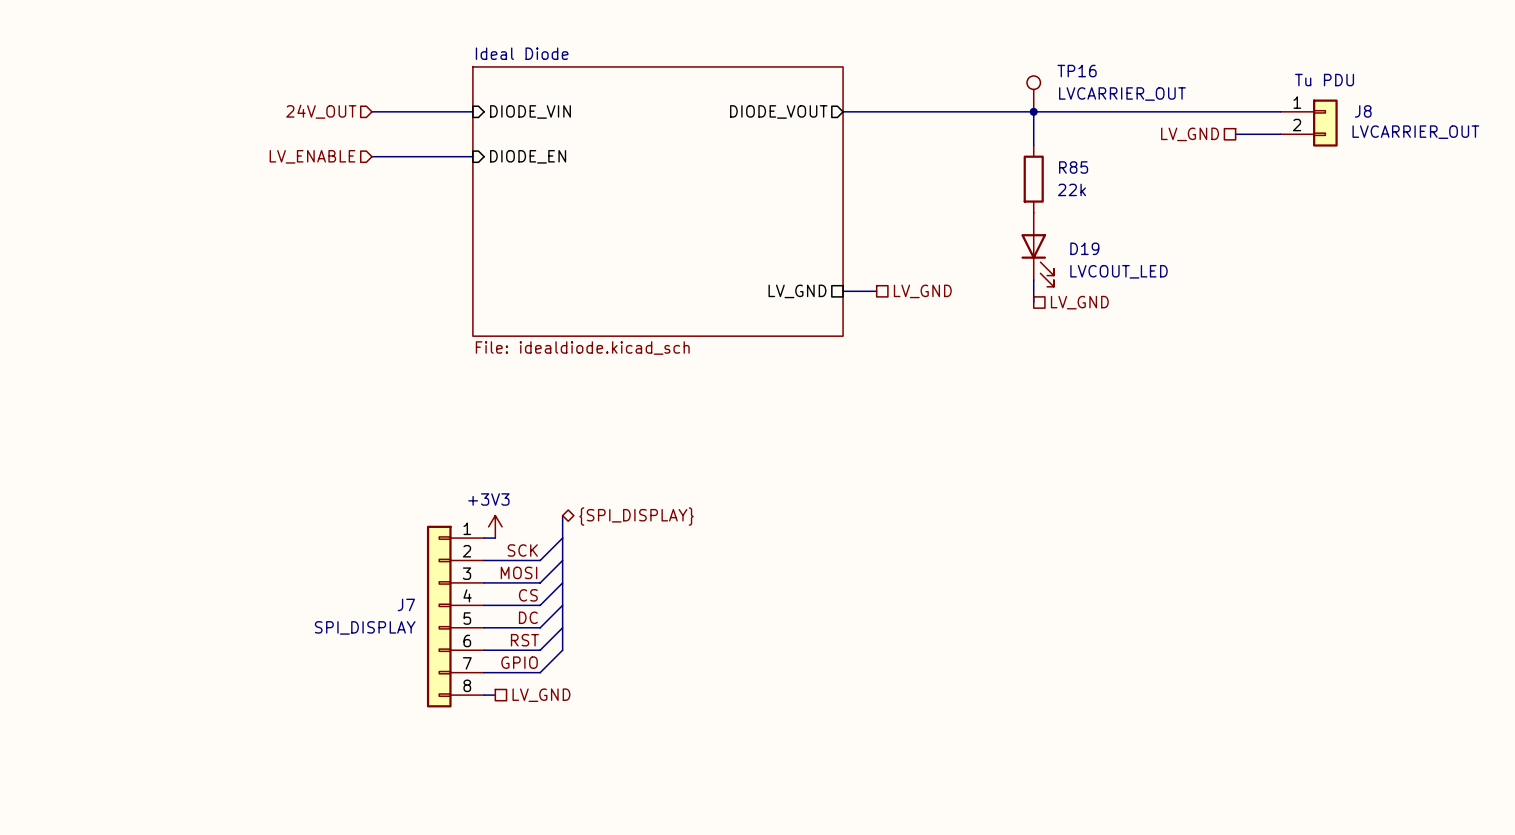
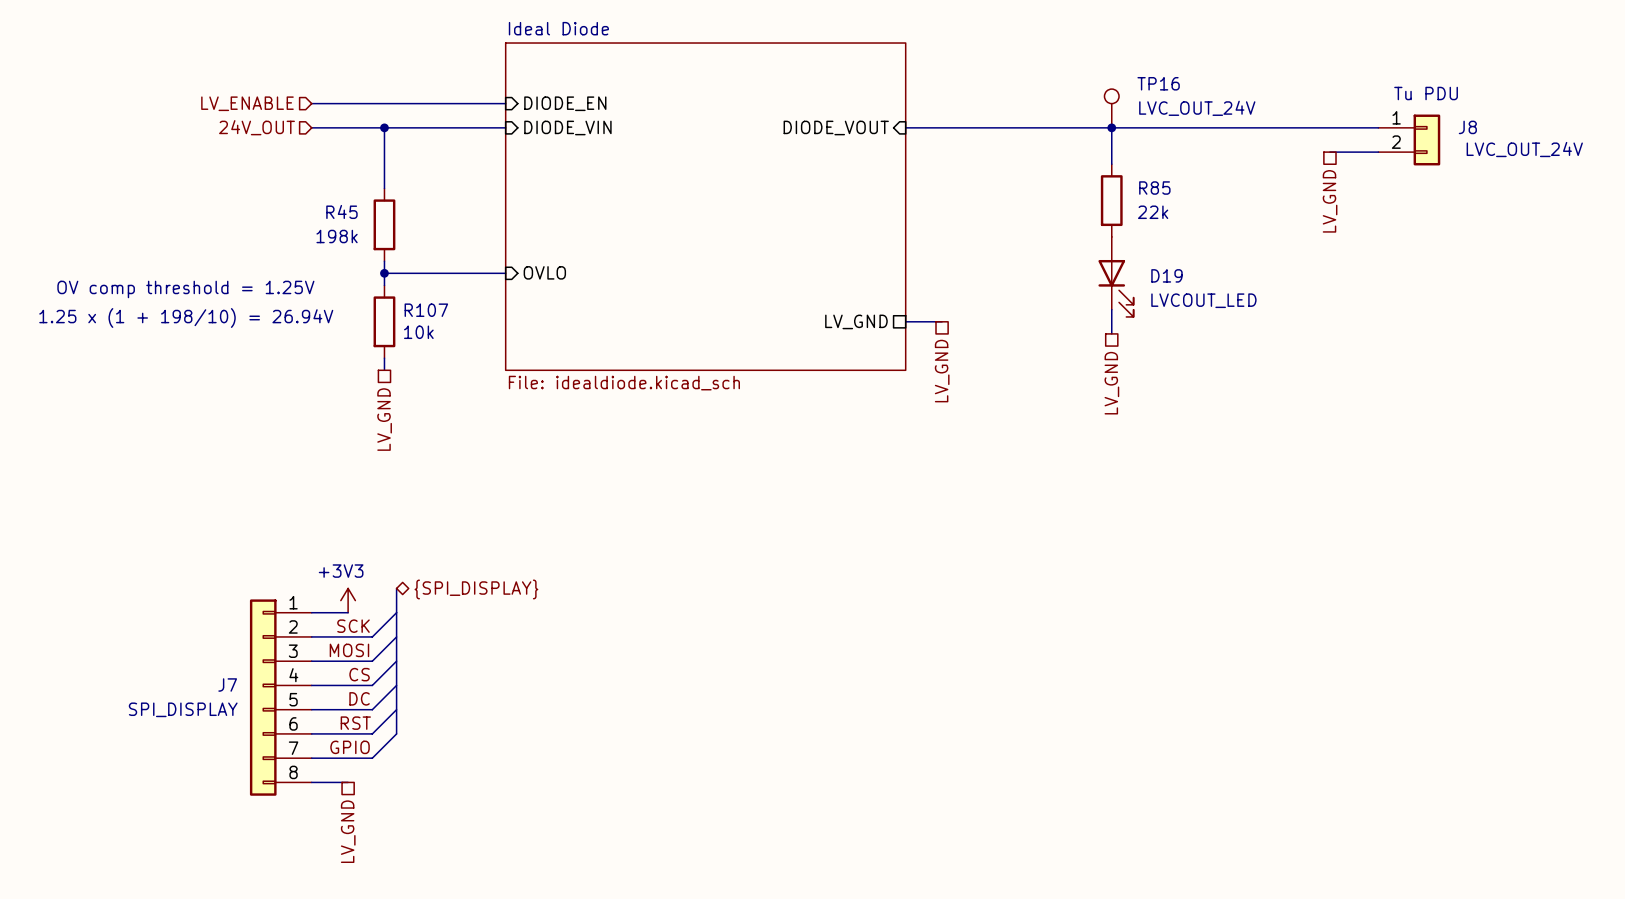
wire: none -> (311, 103) (505, 103)
TP16 value: LVCARRIER_OUT (1122, 94) -> LVC_OUT_24V (1197, 108)
wire: none -> (311, 127) (396, 127)
hierarchical label position: 24V_OUT (321, 111) -> 24V_OUT (257, 127)
wire: none -> (384, 127) (384, 188)
junction: none -> (384, 127)
sheet pin shape: output (778, 111) -> input (836, 127)
J8 value: LVCARRIER_OUT (1415, 132) -> LVC_OUT_24V (1524, 149)
hierarchical label rotation: 0° (1190, 134) -> 90° counterclockwise (1330, 201)
hierarchical label position: LV_ENABLE (312, 156) -> LV_ENABLE (247, 103)
wire: (371, 156) (472, 156) -> none
sheet pin position: DIODE_EN (528, 156) -> DIODE_EN (565, 103)
sheet Ideal Diode: none -> File: idealdiode.kicad_sch (705, 206)
R45: none -> 198k (384, 224)
sheet Ideal Diode: File: idealdiode.kicad_sch (657, 201) -> none
wire: none -> (384, 261) (384, 285)
wire: none -> (384, 273) (505, 273)
junction: none -> (384, 273)
sheet pin: none -> OVLO (544, 272)
text: none -> OV comp threshold = 1.25V (185, 289)
text: none -> 1.25 x (1 + 198/10) = 26.94V (186, 317)
R107: none -> 10k (384, 321)
hierarchical label rotation: 0° (922, 291) -> 90° clockwise (942, 371)
hierarchical label rotation: 0° (1079, 302) -> 90° clockwise (1111, 383)
wire: none -> (384, 358) (384, 370)
hierarchical label: none -> LV_GND (384, 419)
bus: (562, 515) (562, 650) -> (396, 588) (396, 733)
hierarchical label position: {SPI_DISPLAY} (636, 516) -> {SPI_DISPLAY} (476, 589)
power symbol position: +3V3 (495, 526) -> +3V3 (348, 600)
wire: (484, 538) (495, 538) -> none
wire: (562, 538) (540, 560) (484, 560) -> (396, 612) (372, 636) (311, 636)
label position: SCK (522, 550) -> SCK (353, 626)
wire: none -> (311, 612) (348, 612)
wire: (562, 560) (540, 582) (484, 582) -> (396, 636) (372, 661) (311, 661)
label position: MOSI (519, 572) -> MOSI (349, 650)
wire: (562, 582) (540, 605) (484, 605) -> (396, 661) (372, 685) (311, 685)
label position: CS (528, 595) -> CS (359, 674)
wire: (562, 605) (540, 627) (484, 627) -> (396, 685) (372, 709) (311, 709)
J7 position: (455, 616) -> (280, 697)
label position: DC (528, 617) -> DC (359, 698)
wire: (562, 627) (540, 650) (484, 650) -> (396, 709) (372, 733) (311, 733)
label position: RST (524, 640) -> RST (355, 723)
wire: (562, 650) (540, 672) (484, 672) -> (396, 733) (372, 758) (311, 758)
label position: GPIO (519, 662) -> GPIO (350, 747)
wire: (484, 695) (495, 695) -> none
hierarchical label rotation: 0° (541, 695) -> 90° clockwise (348, 831)
hierarchical label position: LV_GND (541, 695) -> LV_GND (348, 831)
wire: none -> (311, 782) (348, 782)

